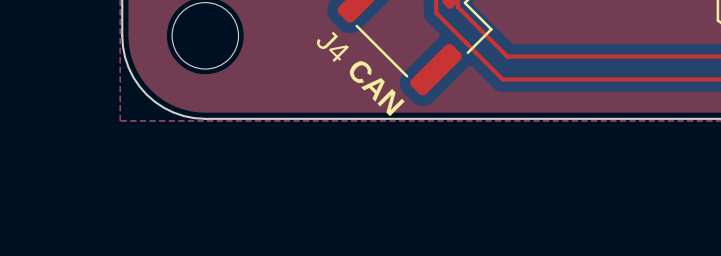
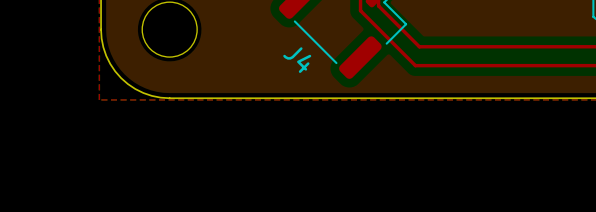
J4 name position: J4 (332, 46) -> J4 (297, 60)
text: CAN (377, 88) -> none

